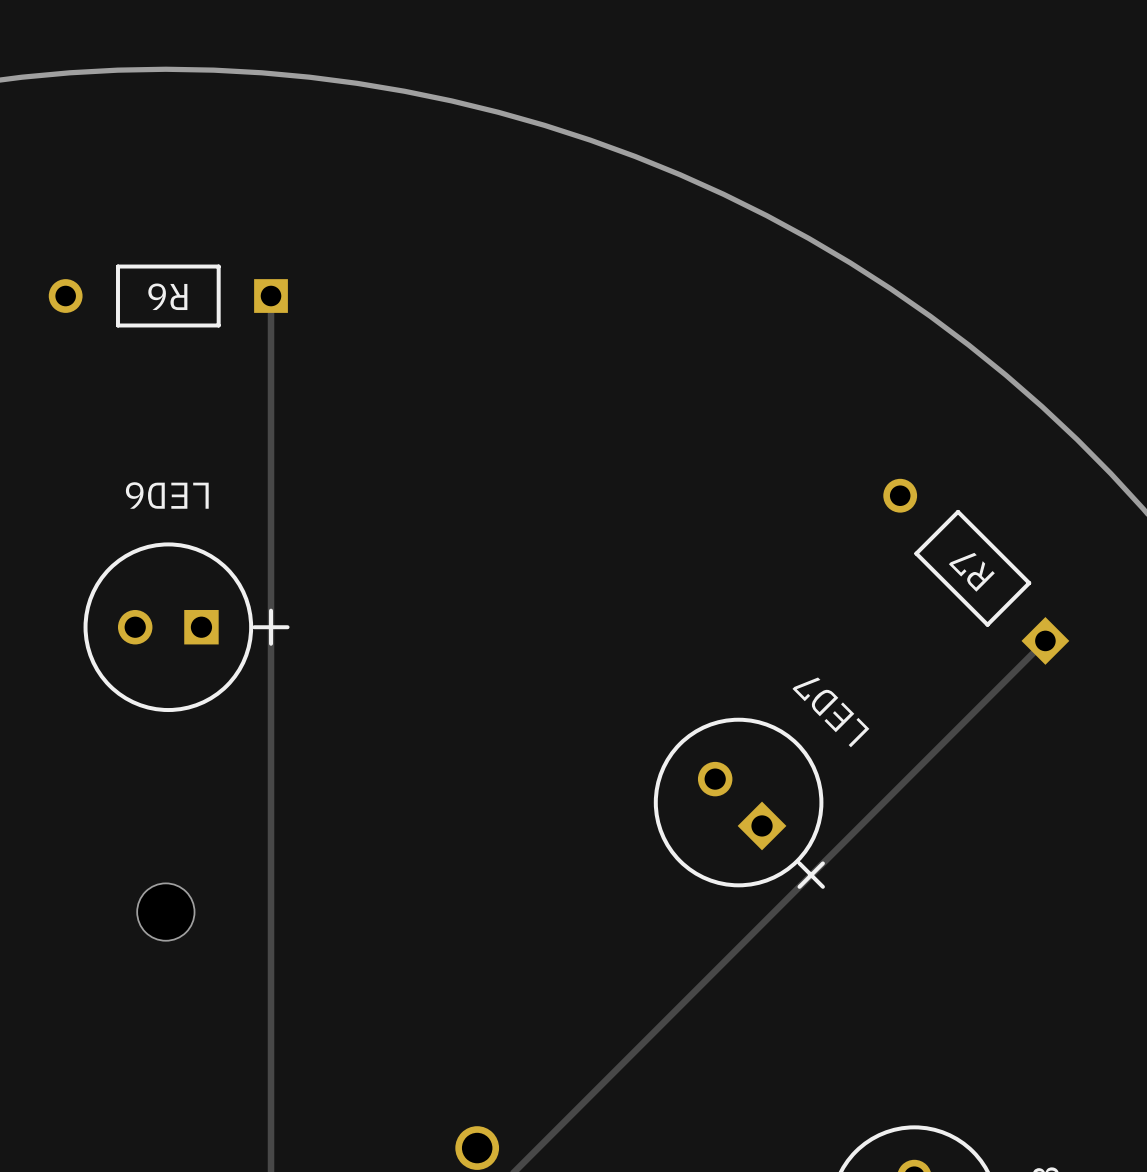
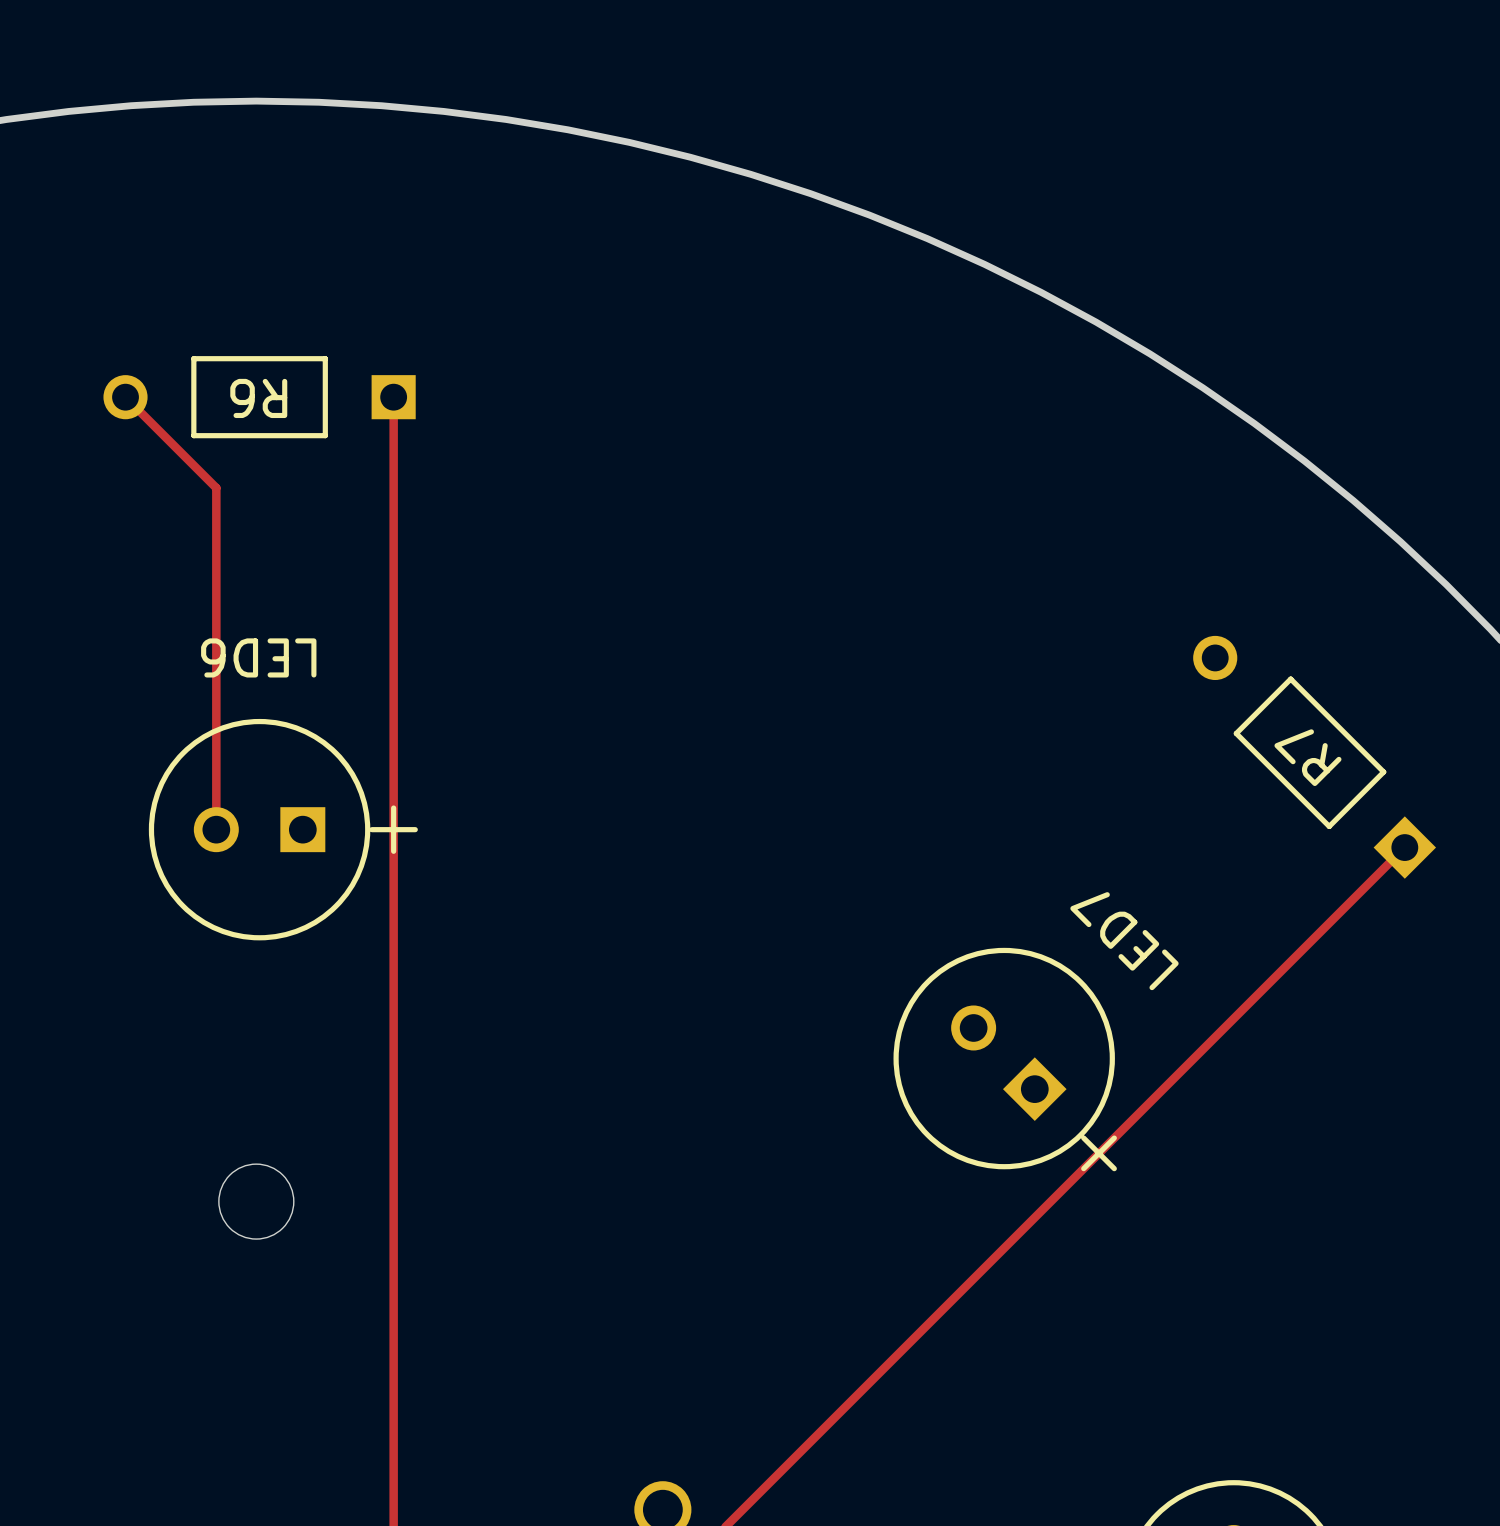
track: none -> (125, 397) (216, 488) (216, 829)

